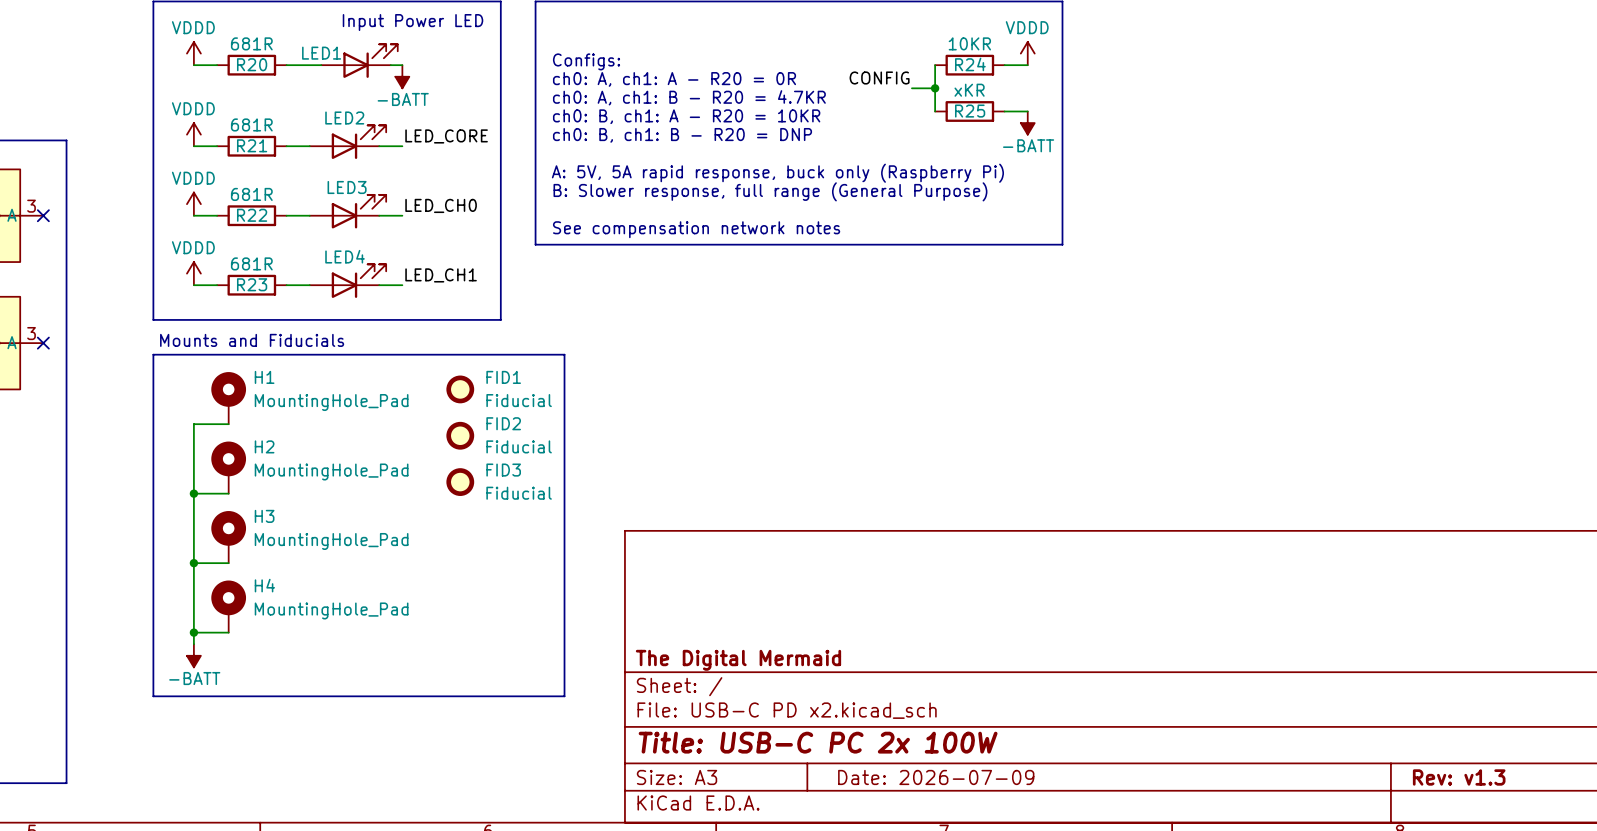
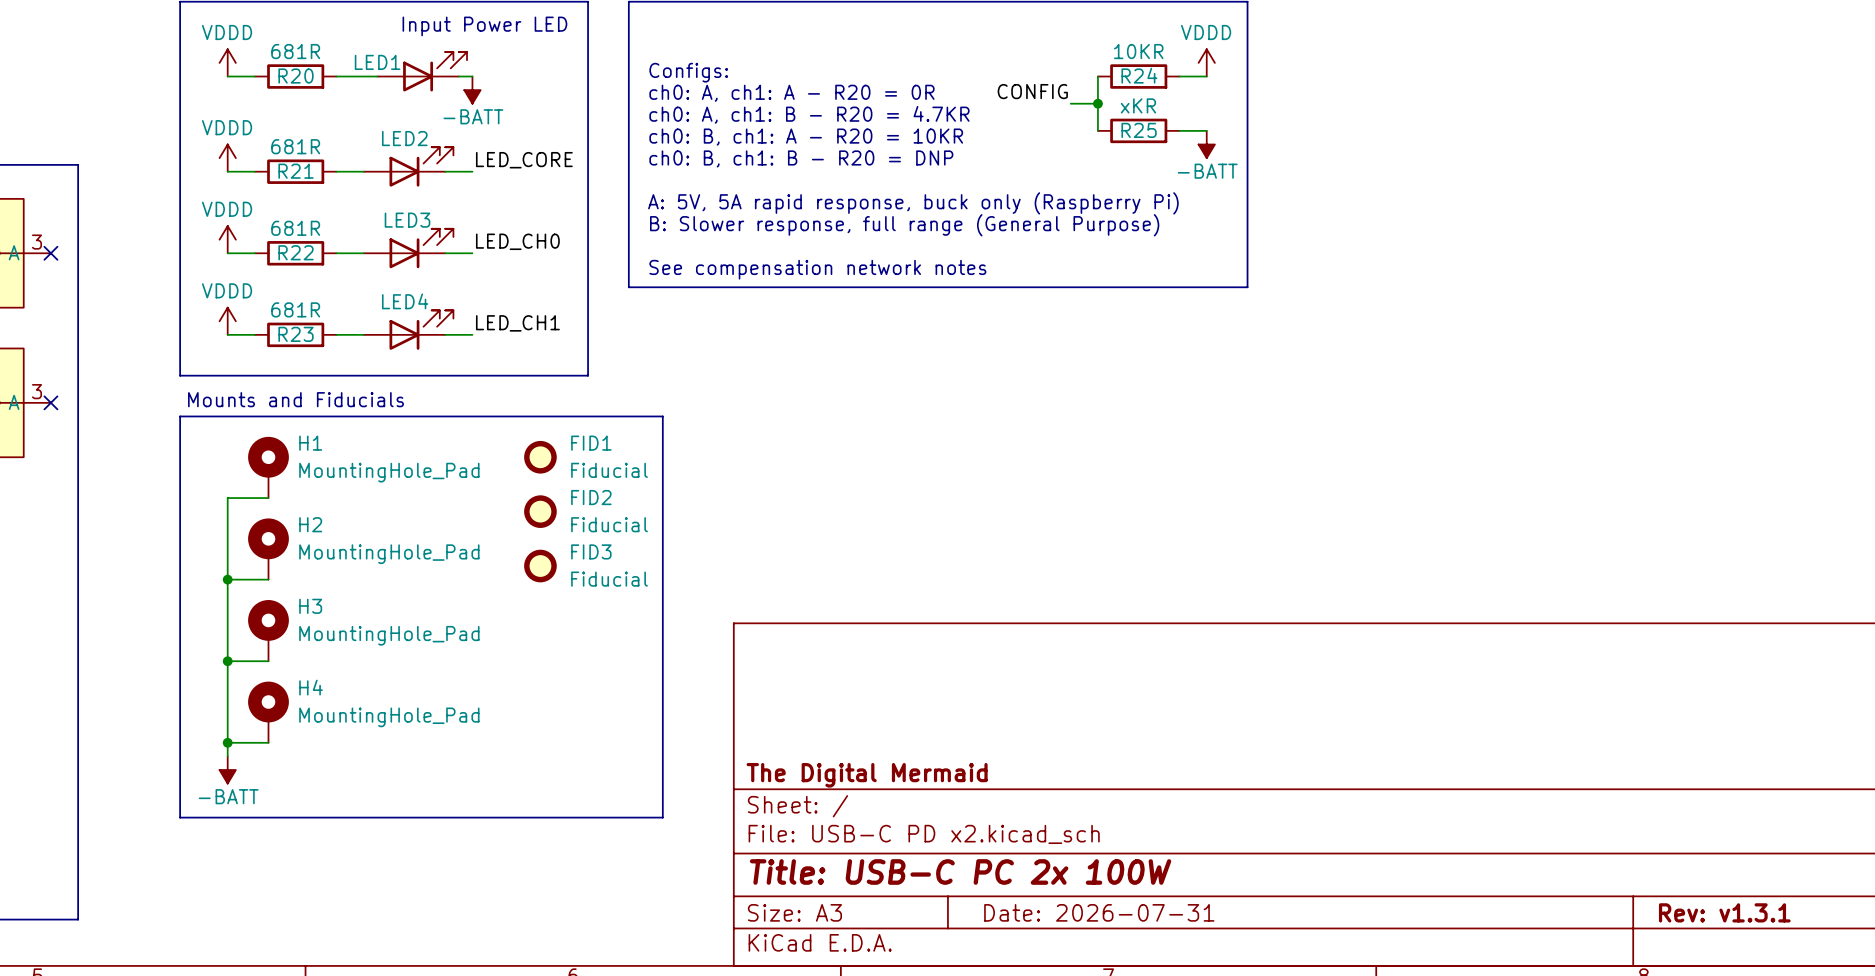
title block: Date: 2026-07-09 (936, 777) -> Date: 2026-07-31 (1099, 912)
title block: Rev: v1.3 (1459, 777) -> Rev: v1.3.1 (1724, 912)

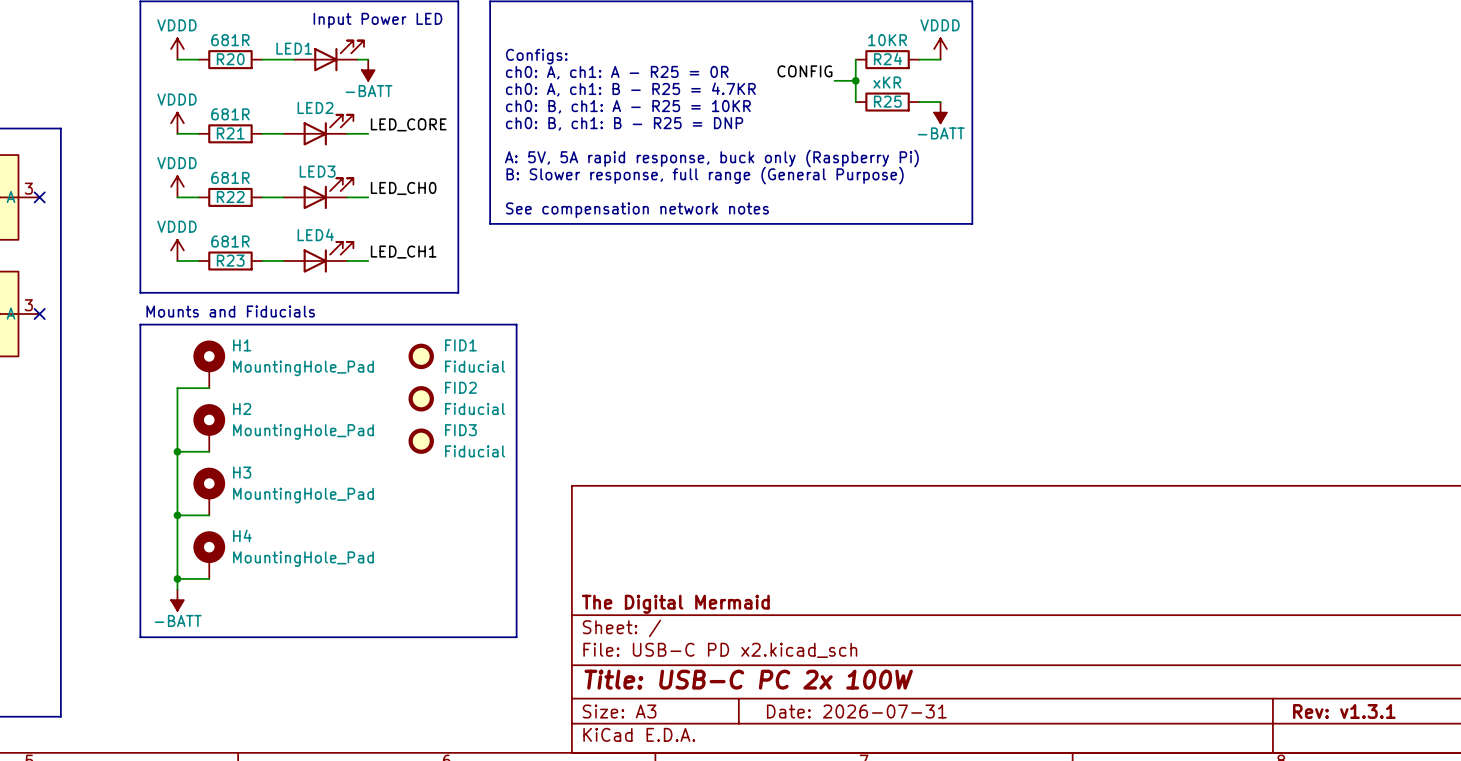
text: ch0: A, ch1: A - R20 = 0R (791, 93) -> ch0: A, ch1: A - R25 = 0R (617, 72)
text: ch0: A, ch1: B - R20 = 4.7KR (809, 114) -> ch0: A, ch1: B - R25 = 4.7KR (630, 89)
text: ch0: B, ch1: A - R20 = 10KR (806, 137) -> ch0: B, ch1: A - R25 = 10KR (628, 106)
text: ch0: B, ch1: B - R20 = DNP (801, 158) -> ch0: B, ch1: B - R25 = DNP (624, 123)

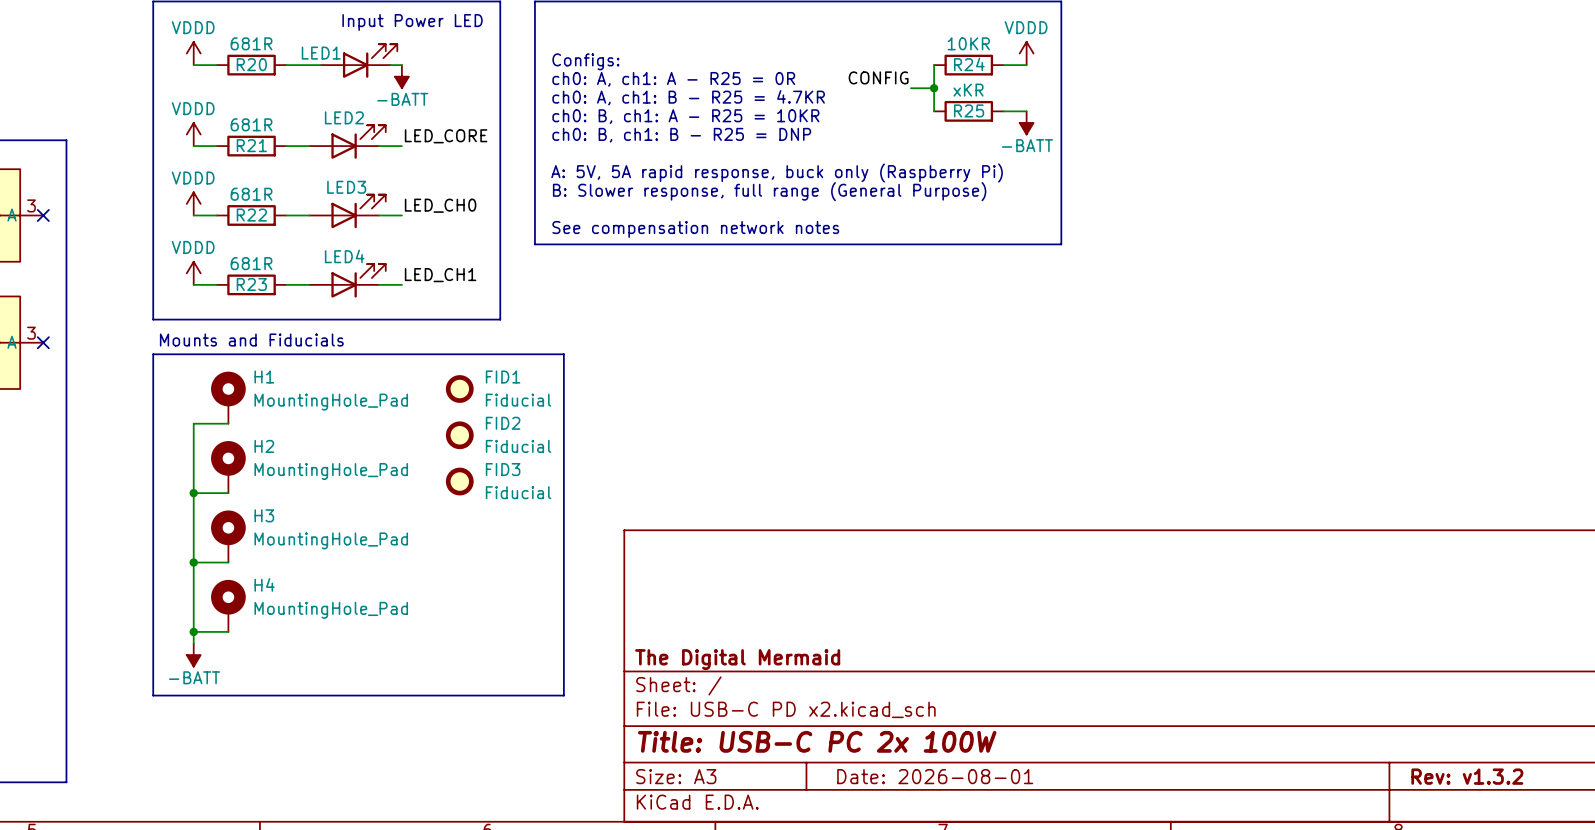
title block: Date: 2026-07-31 (856, 711) -> Date: 2026-08-01 (935, 776)
title block: Rev: v1.3.1 (1344, 711) -> Rev: v1.3.2 (1467, 776)

